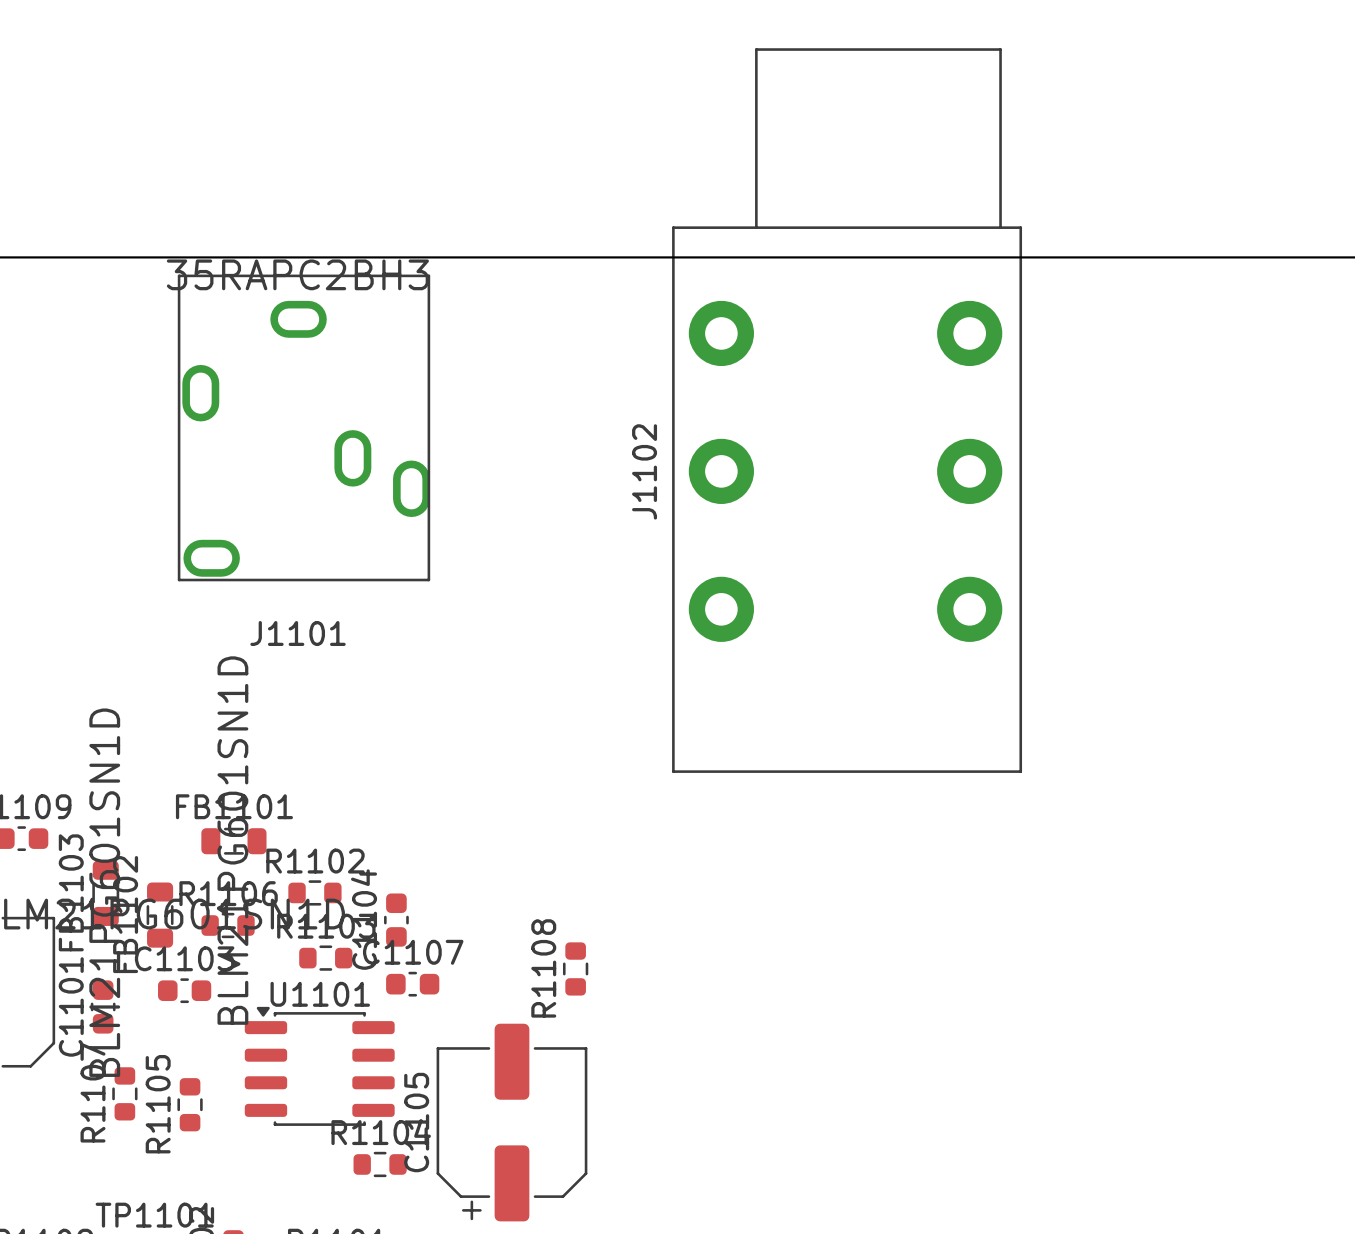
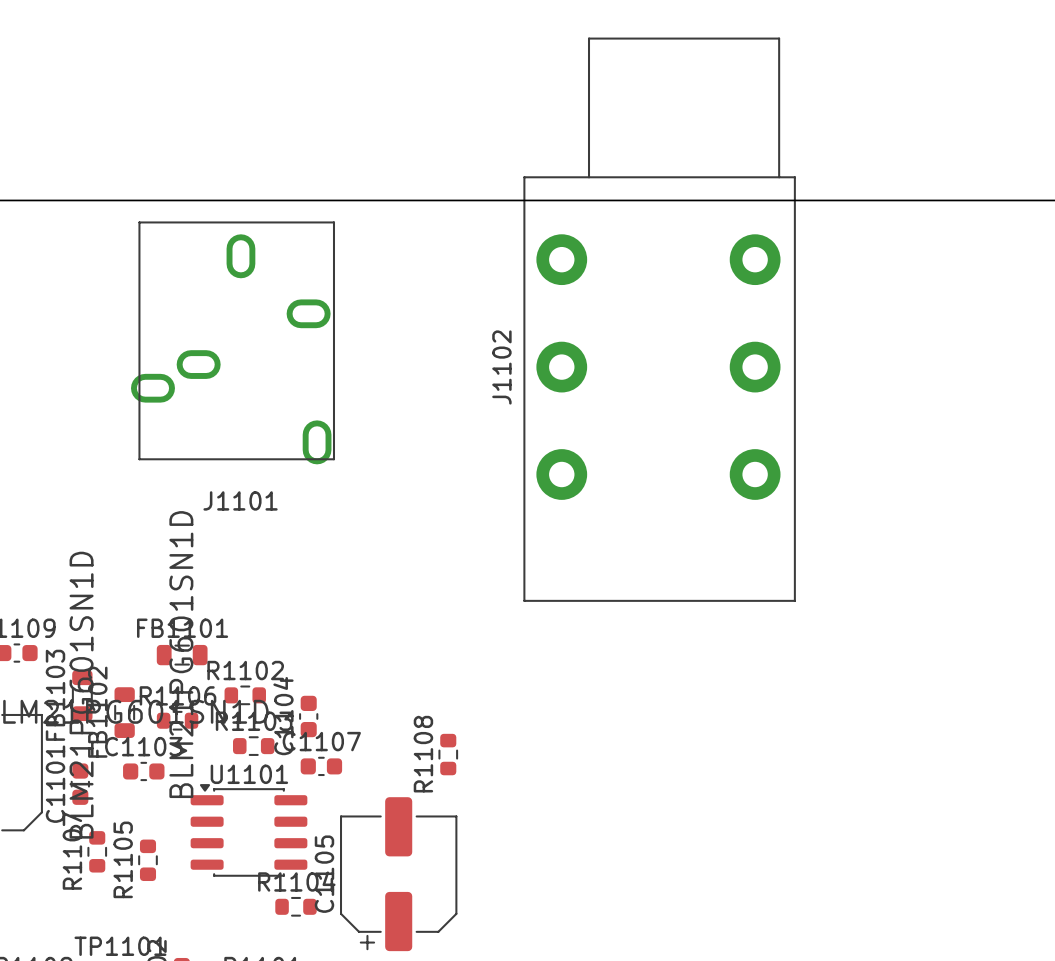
J1101 footprint: [177, 274, 431, 582] -> [130, 221, 336, 465]
J1101 text: 35RAPC2BH3 (297, 274) -> none

